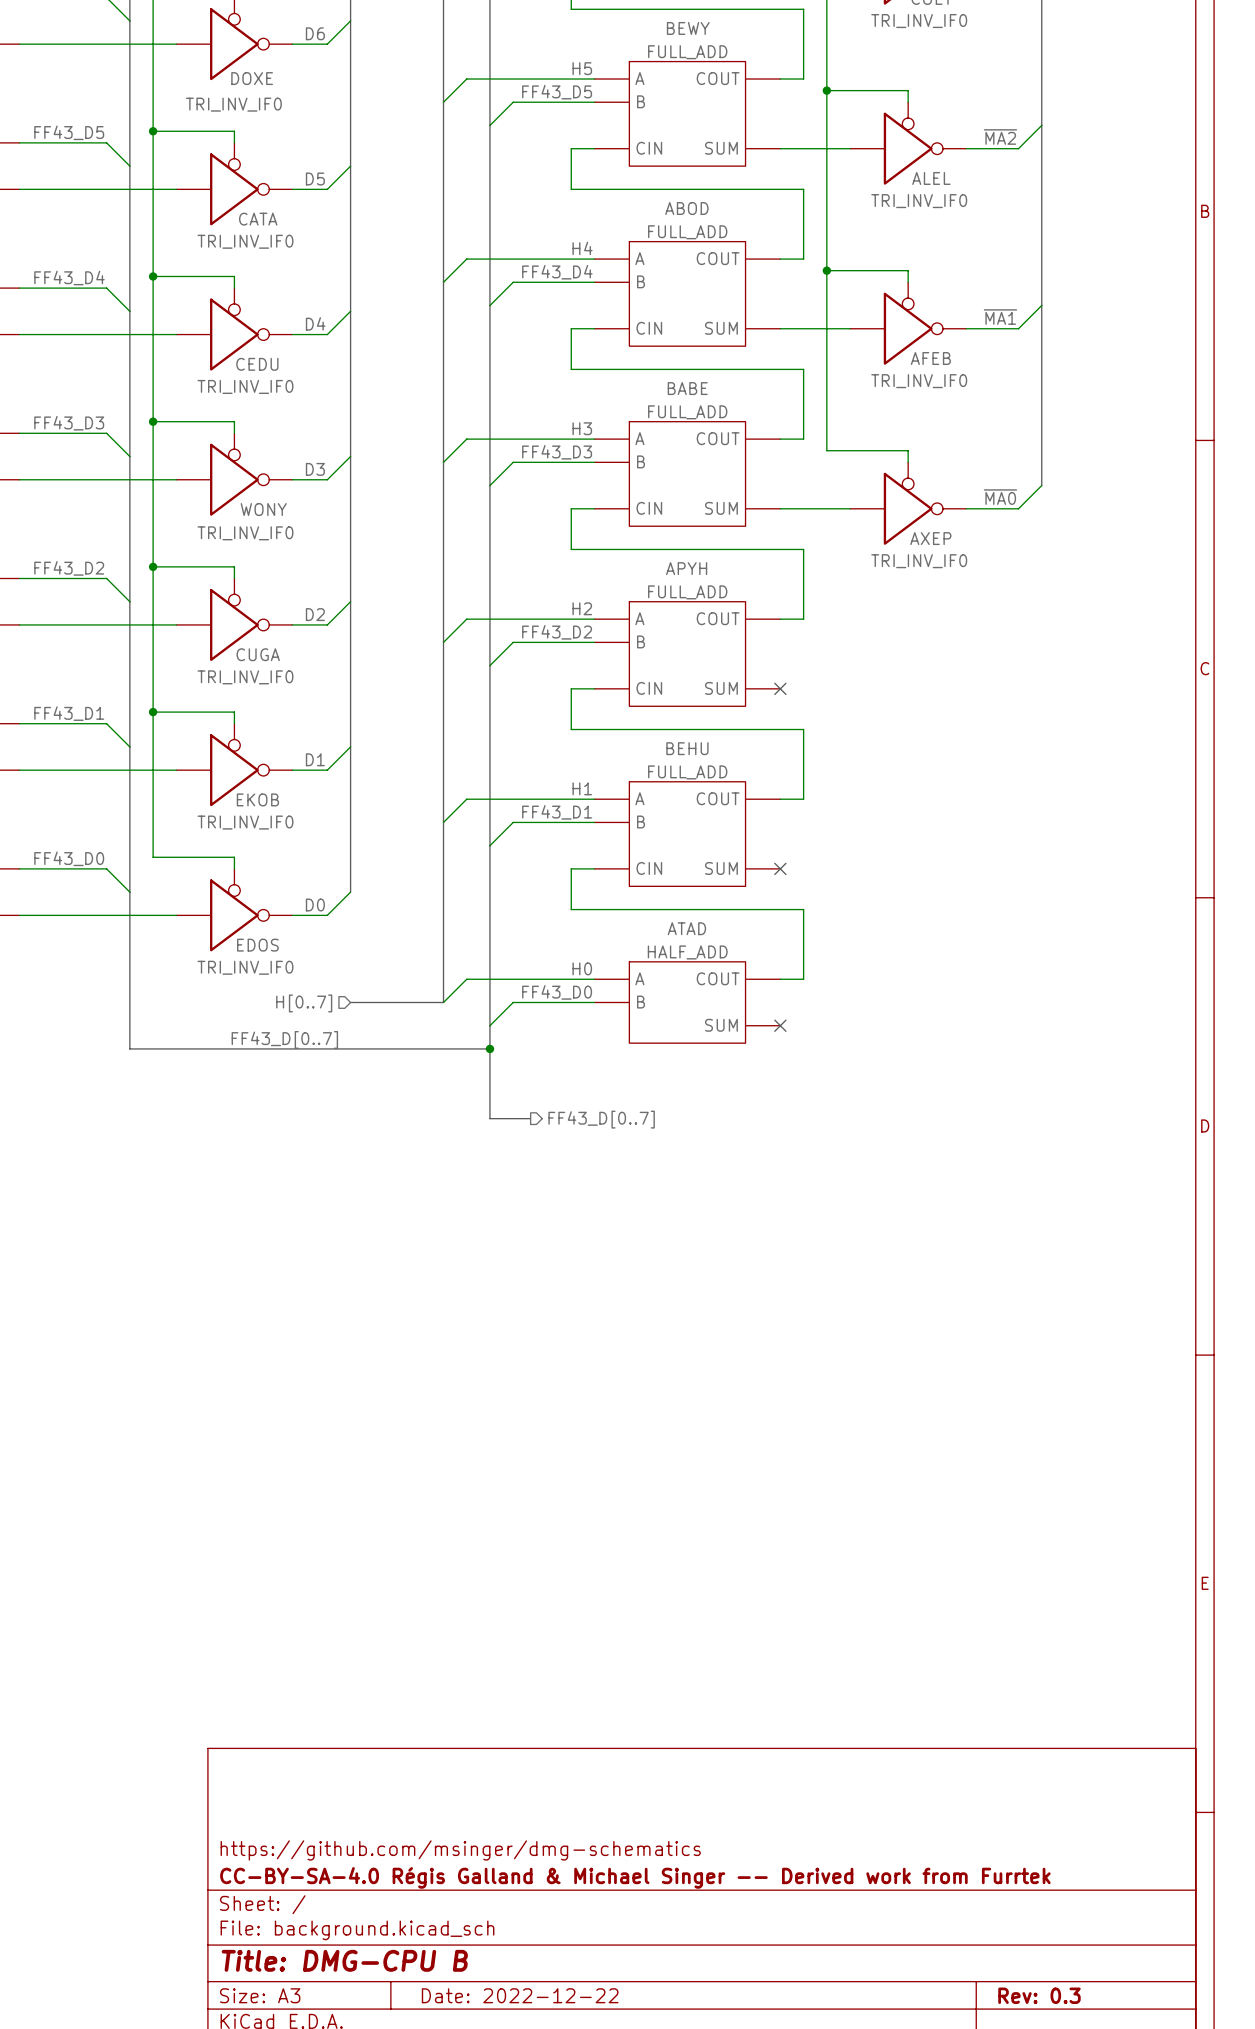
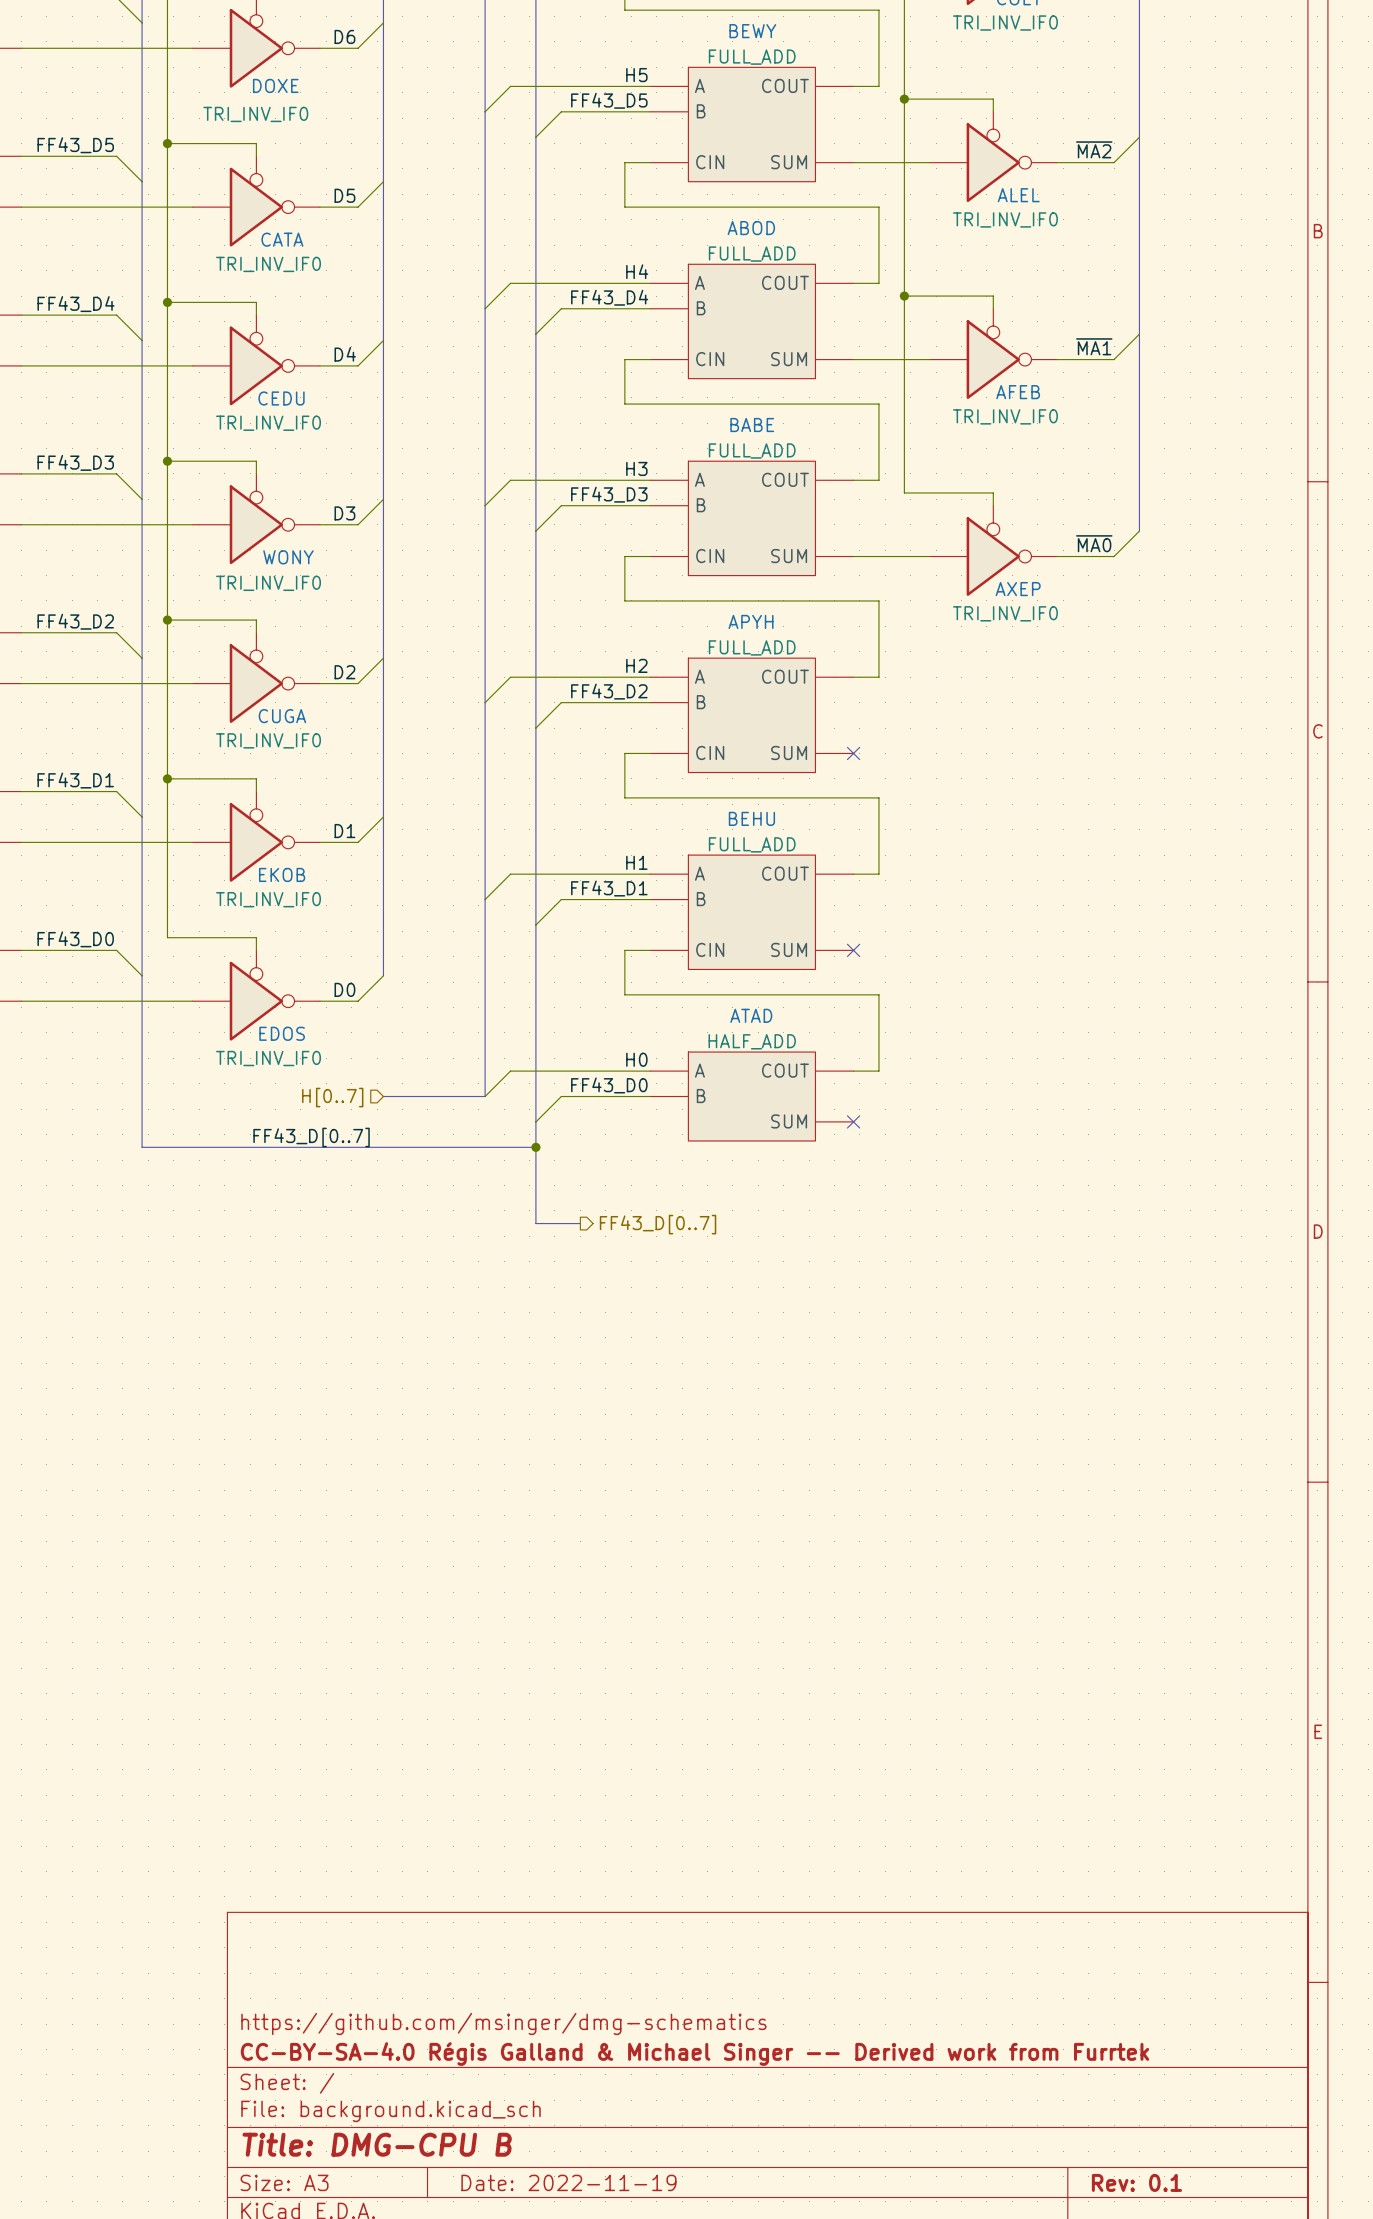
title block: Date: 2022-12-22 (520, 1995) -> Date: 2022-11-19 (568, 2182)
title block: Rev: 0.3 (1039, 1995) -> Rev: 0.1 (1136, 2182)

